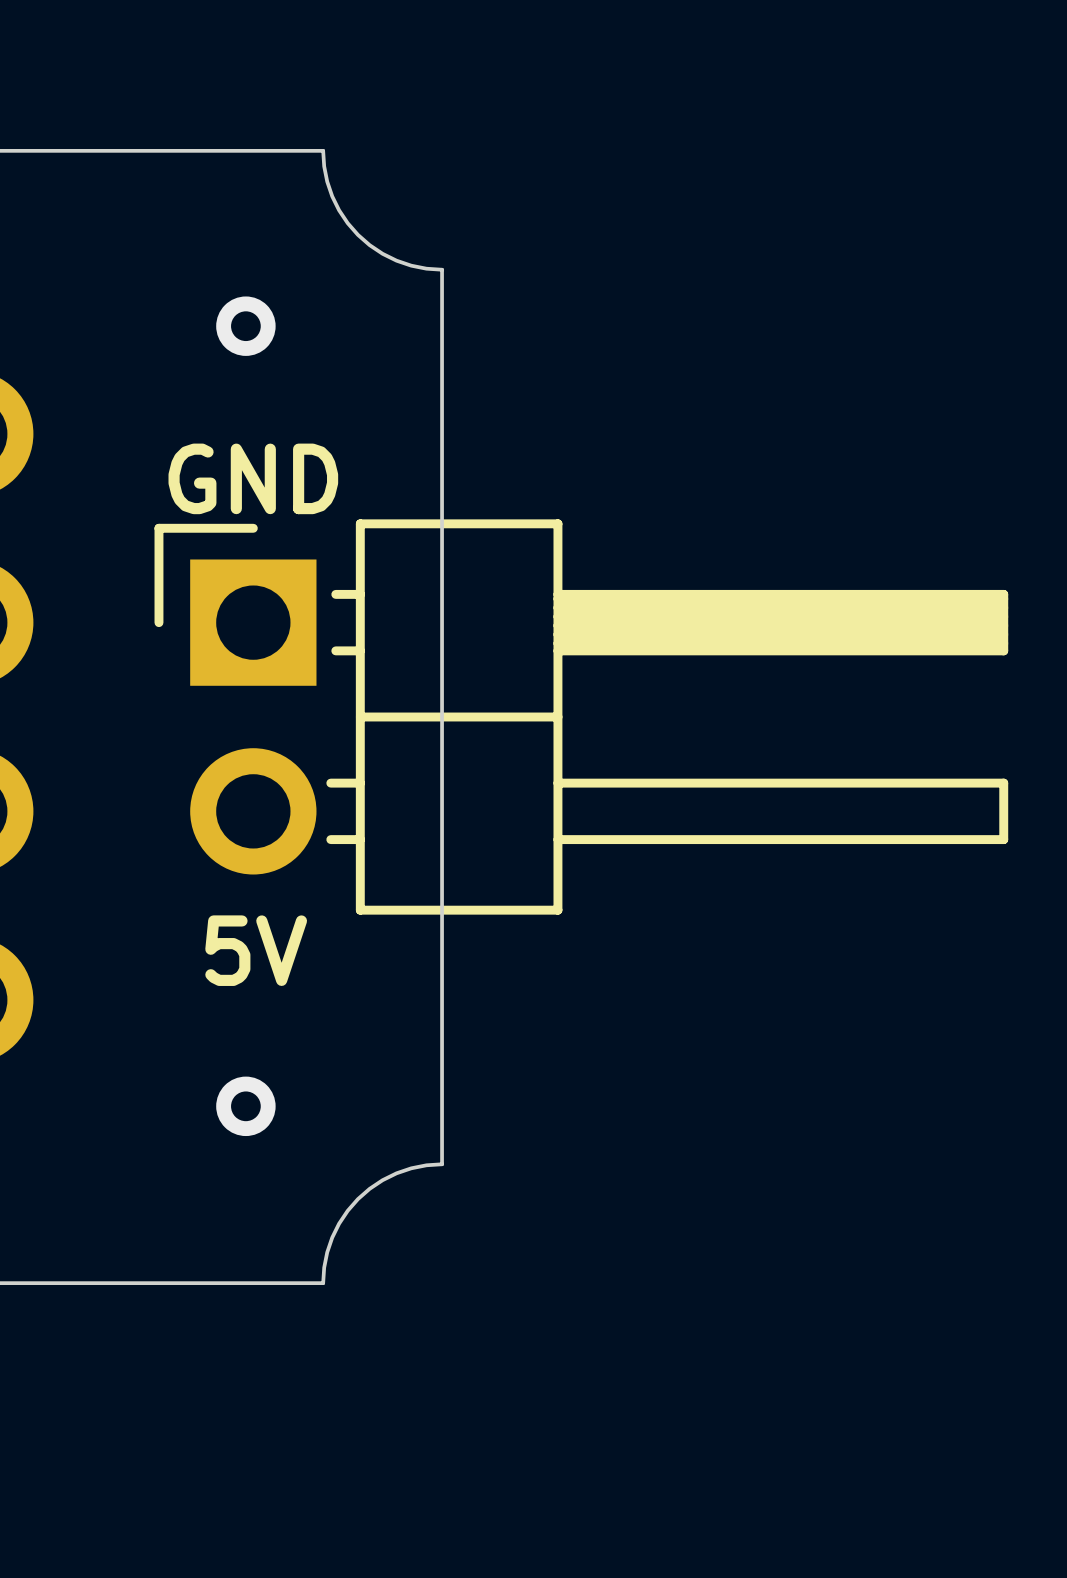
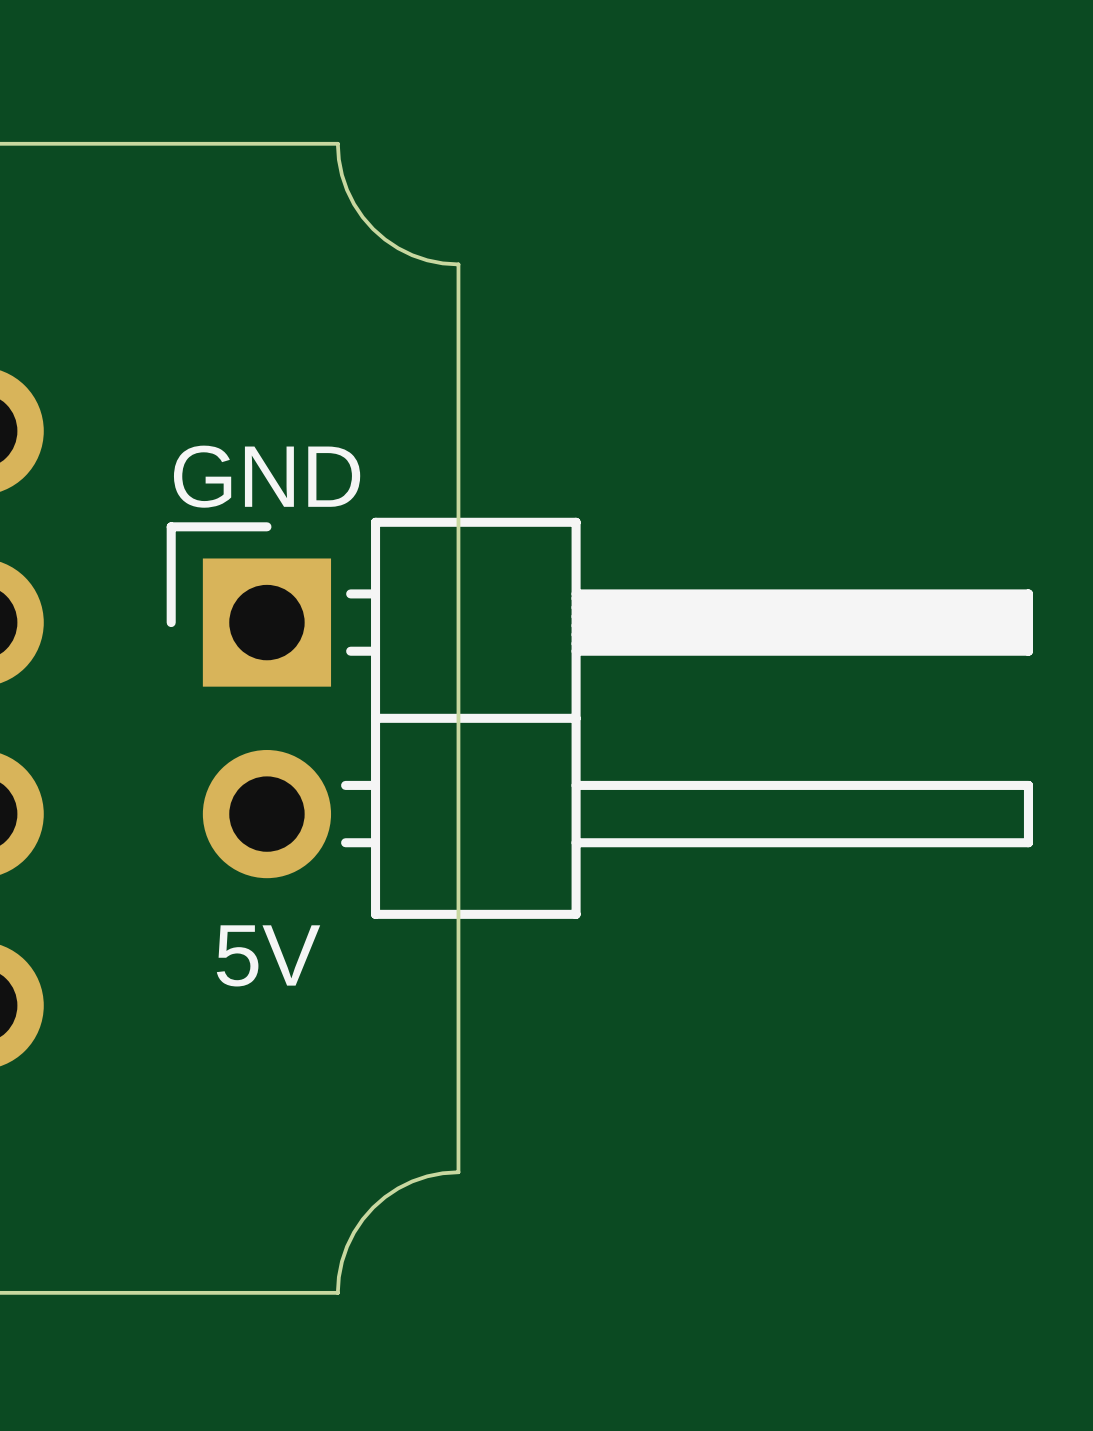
via: (245, 326) -> none
via: (245, 1106) -> none

